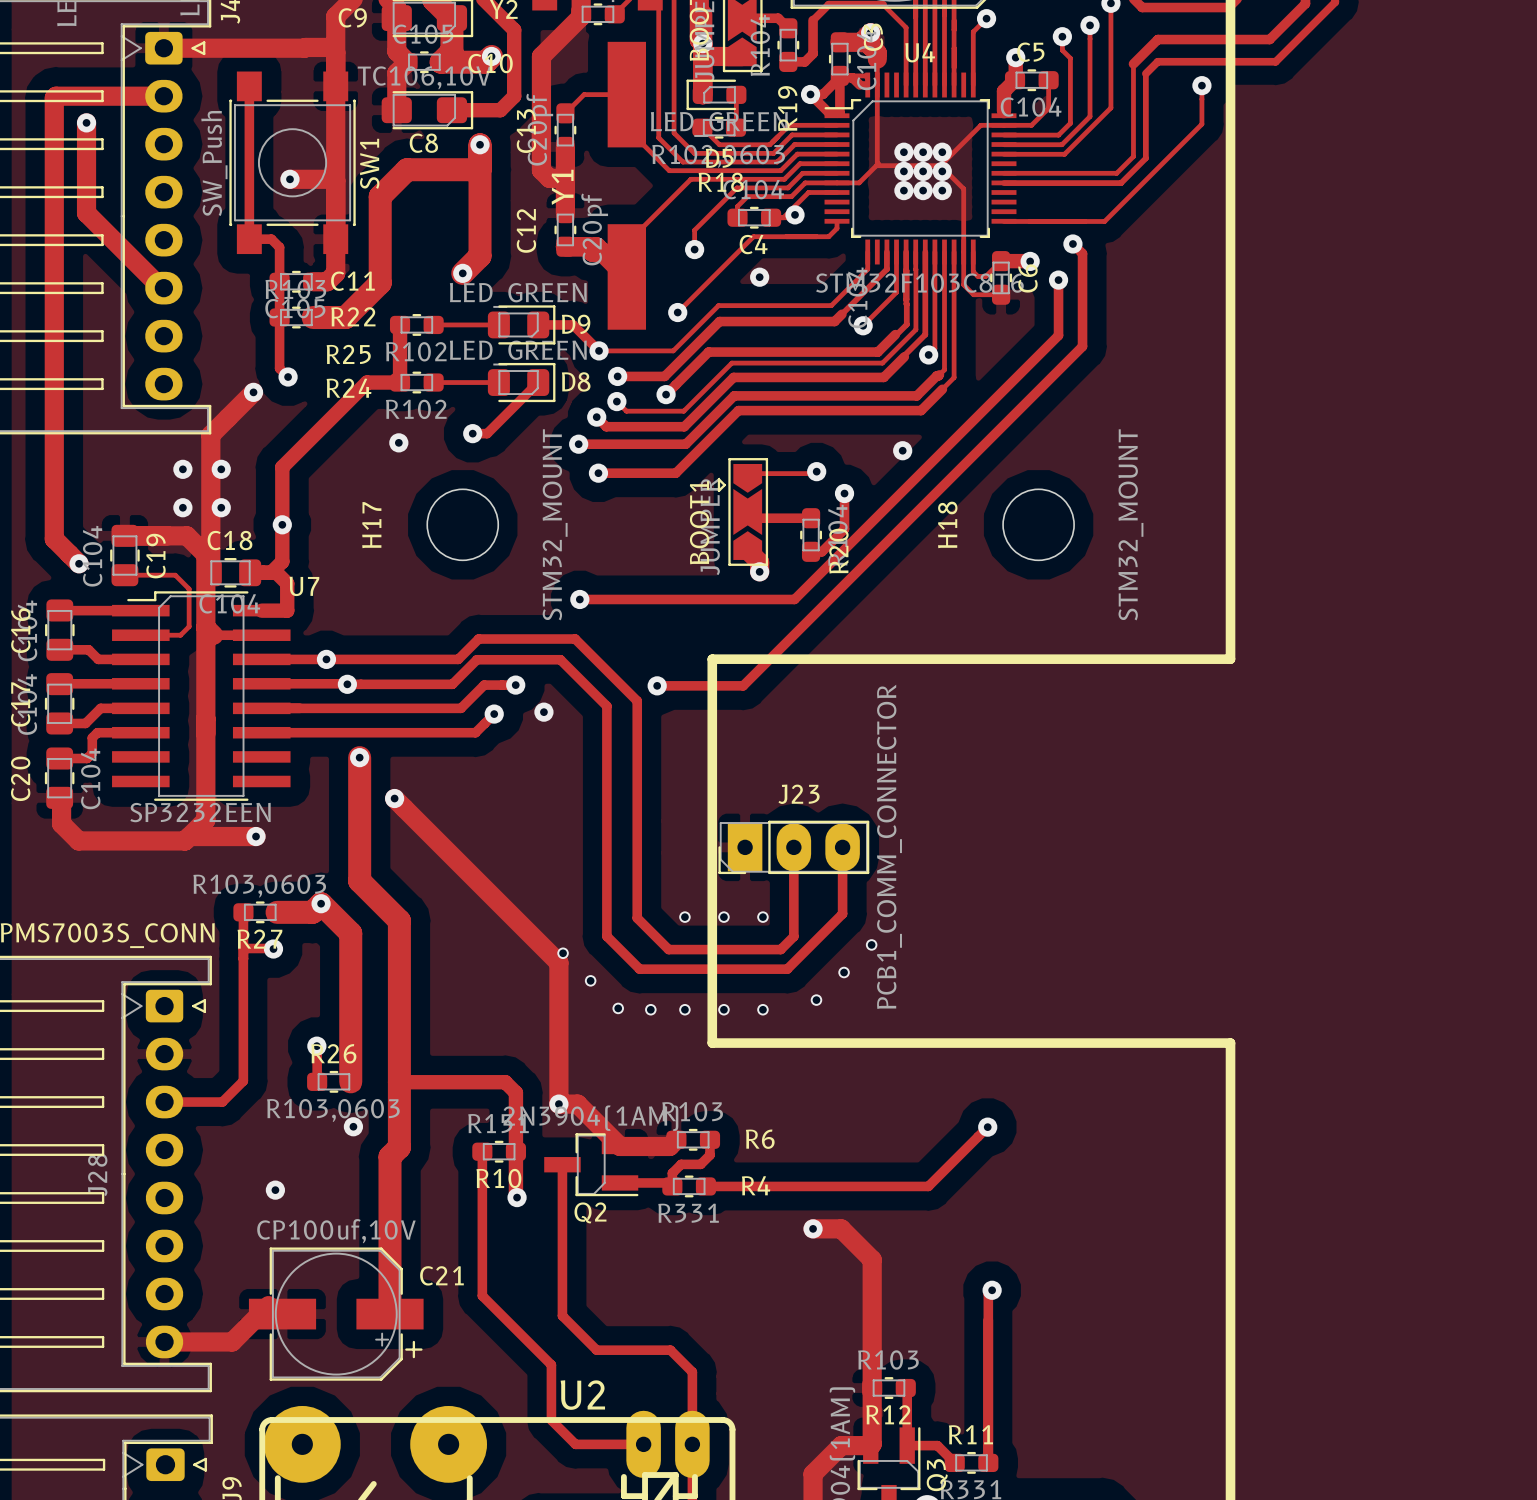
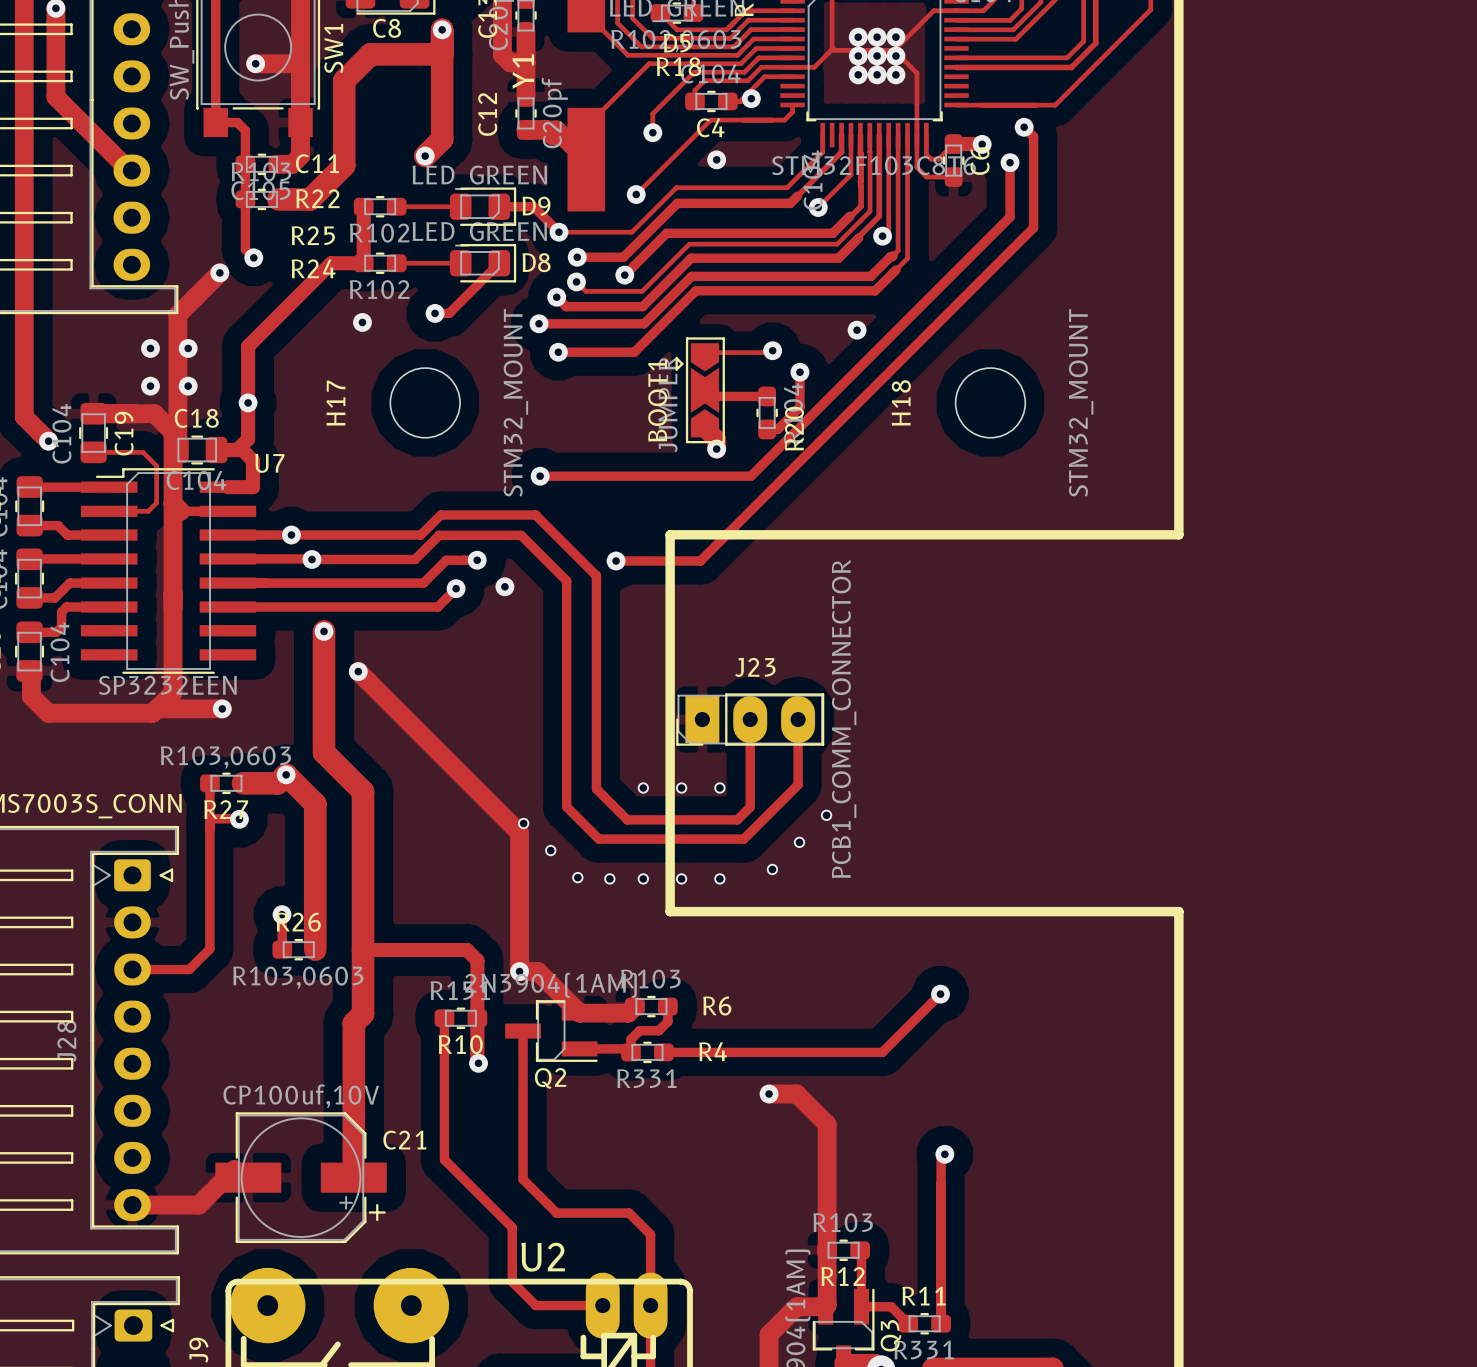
via: (353, 1126) -> none
via: (275, 1190) -> none

